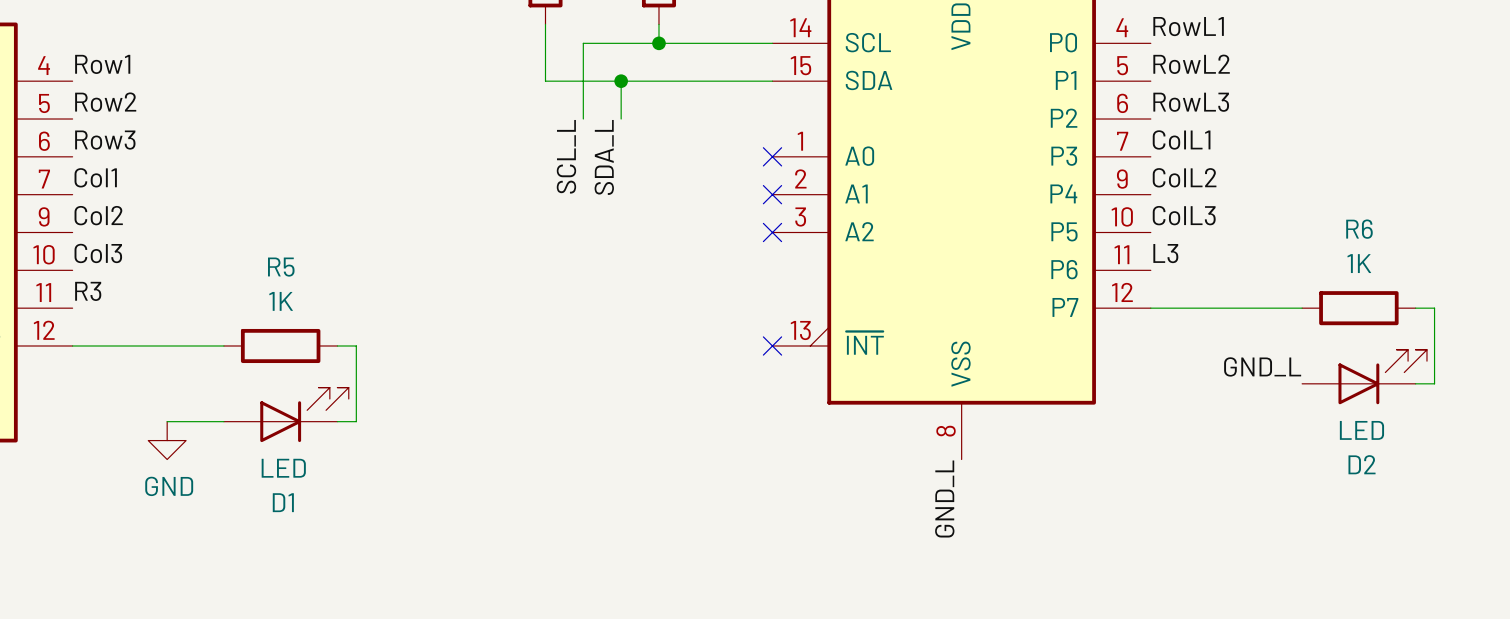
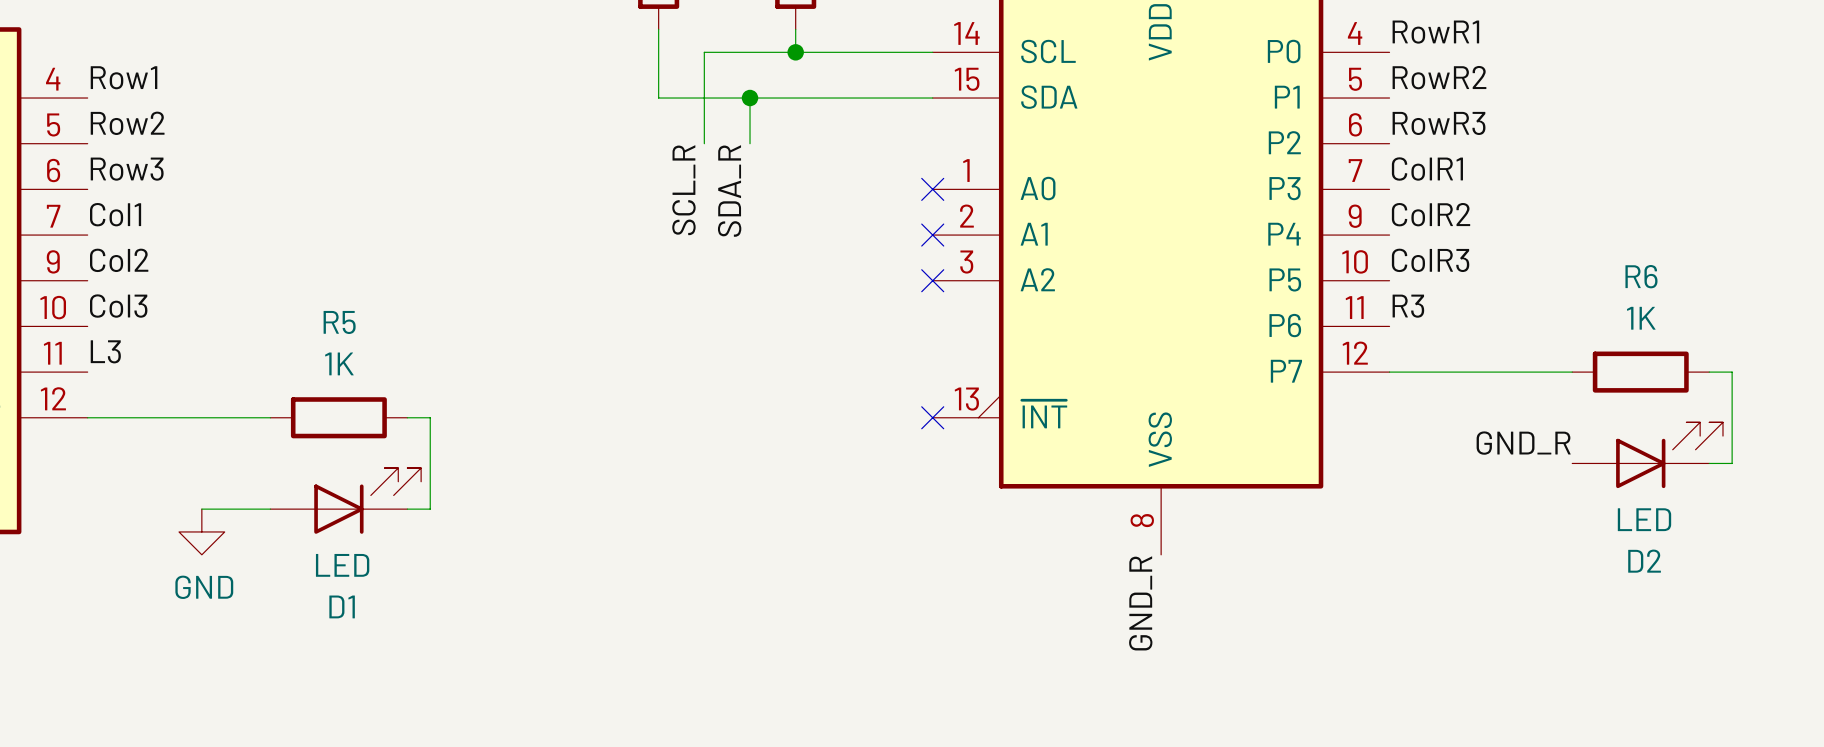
label: RowL1 (1188, 26) -> RowR1 (1435, 32)
label: RowL2 (1191, 64) -> RowR2 (1439, 77)
label: RowL3 (1191, 102) -> RowR3 (1439, 123)
label: ColL1 (1181, 139) -> ColR1 (1427, 169)
label: SCL_L (566, 156) -> SCL_R (683, 190)
label: SDA_L (604, 157) -> SDA_R (729, 191)
label: ColL2 (1184, 177) -> ColR2 (1431, 214)
label: ColL3 (1184, 215) -> ColR3 (1430, 260)
label: L3 (1165, 253) -> R3 (1408, 306)
label: R3 (88, 291) -> L3 (105, 351)
label: GND_L (1262, 366) -> GND_R (1523, 443)
label: GND_L (944, 498) -> GND_R (1140, 603)

